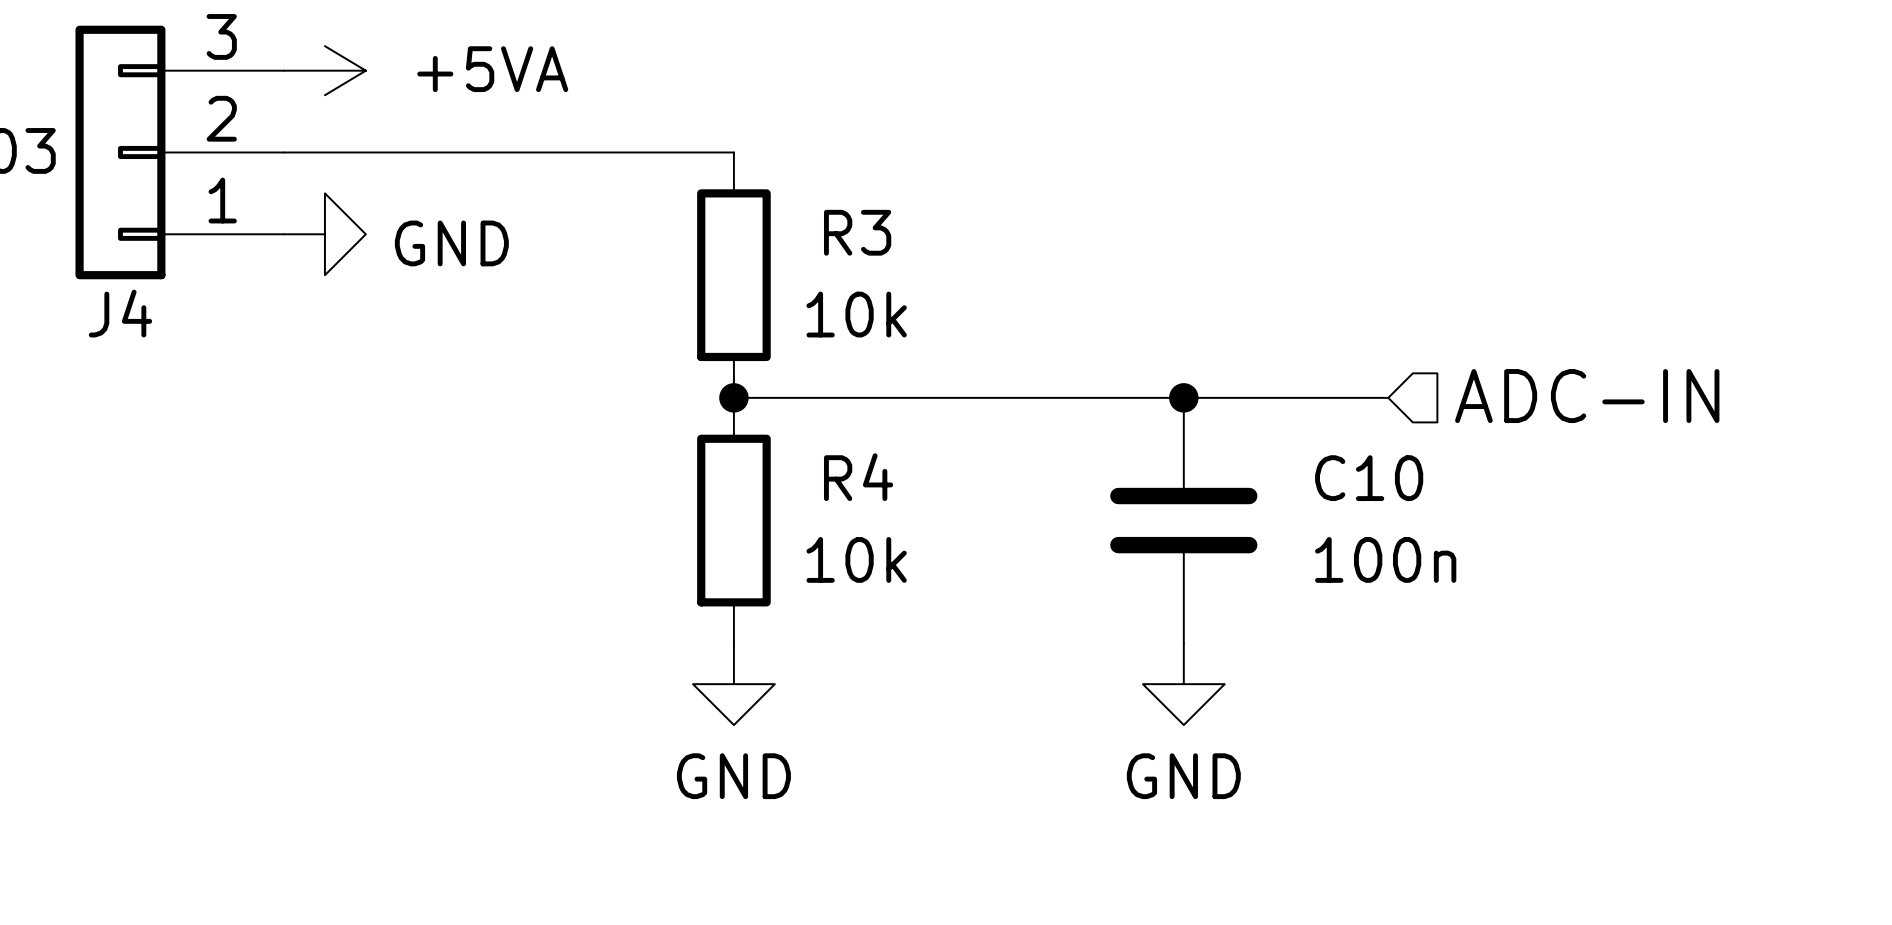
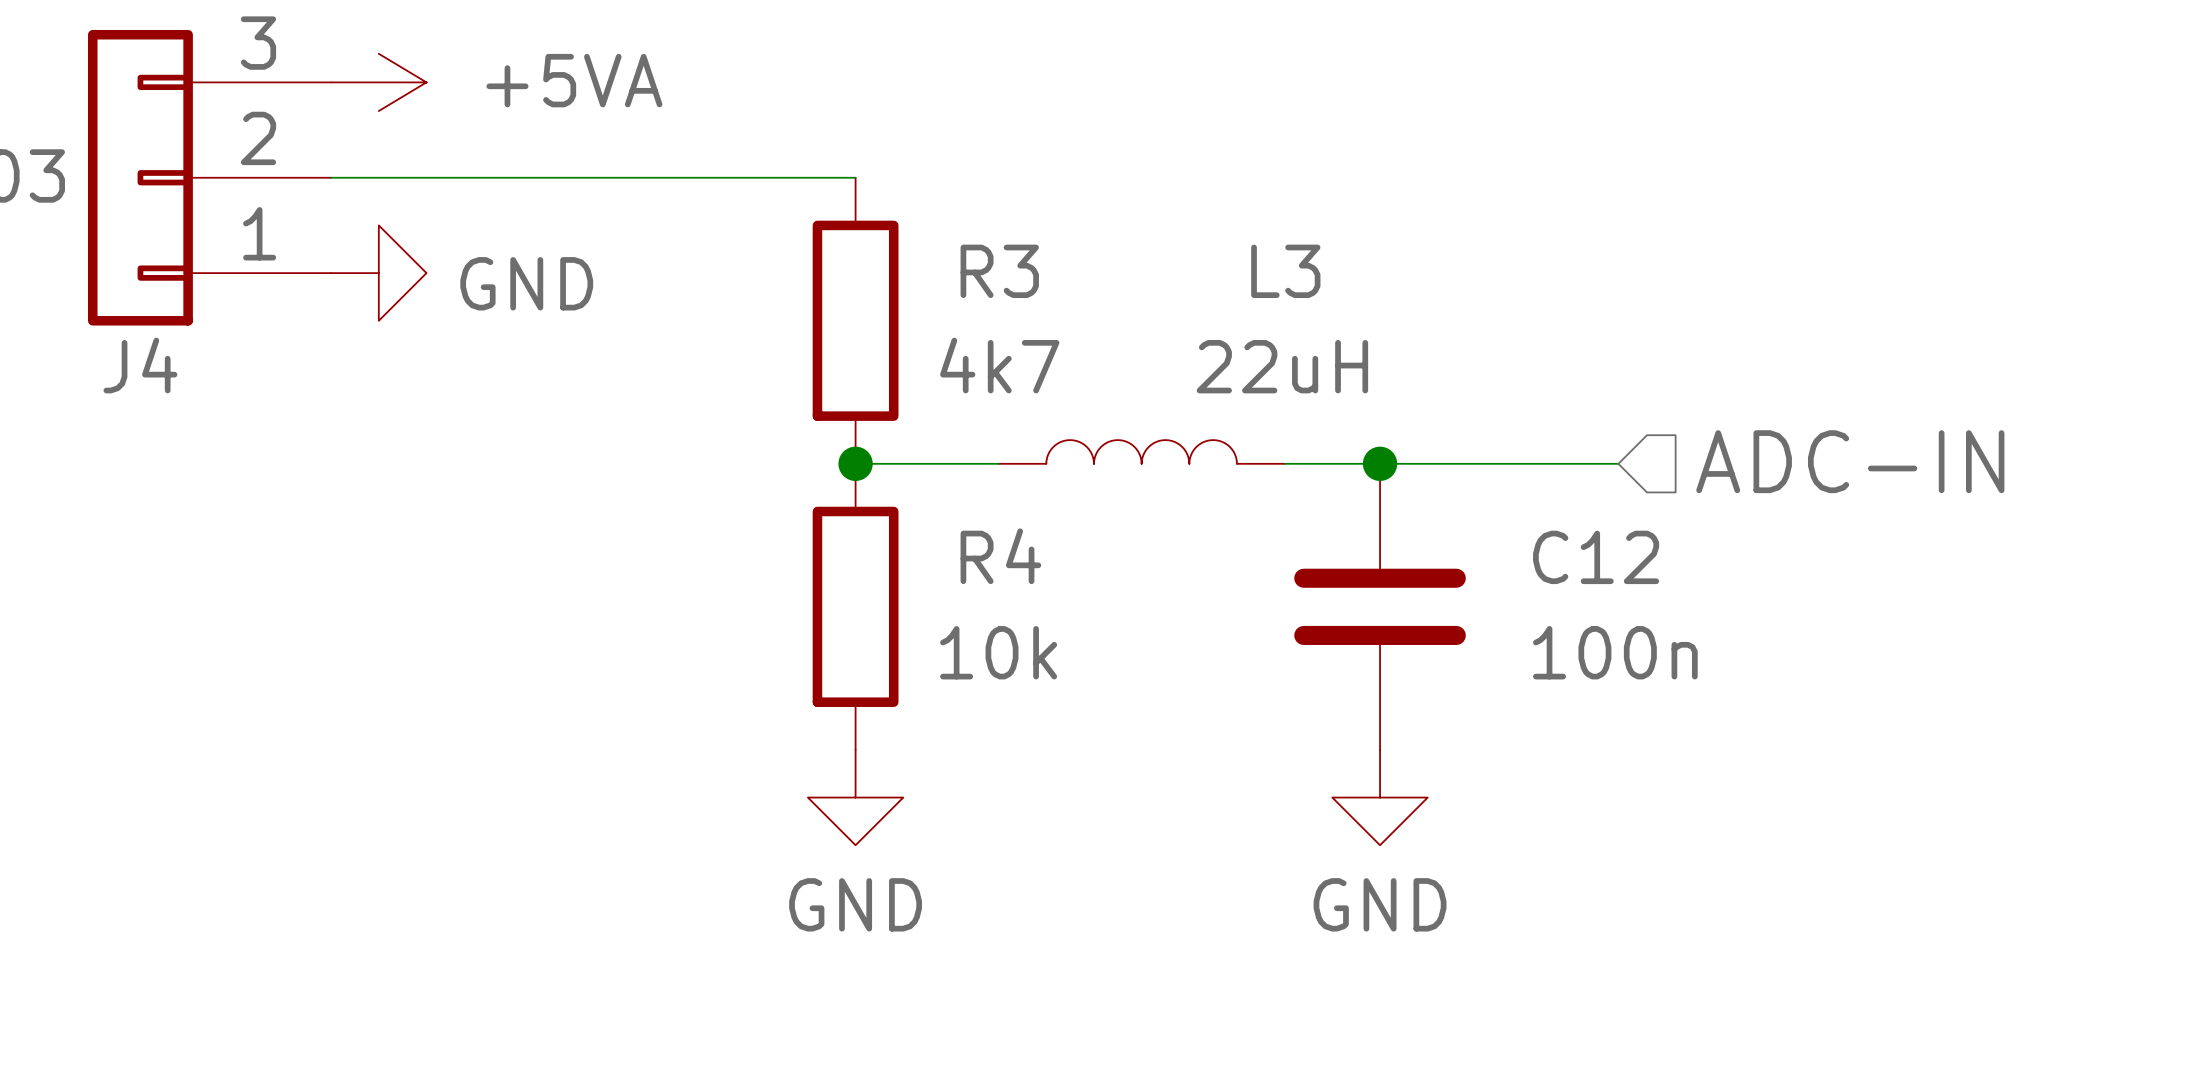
R3 value: 10k (856, 314) -> 4k7 (999, 365)
L3: none -> 22uH (1141, 451)
wire: (856, 397) (1102, 397) -> none
C10 name: C10 (1369, 478) -> C12 (1596, 557)

